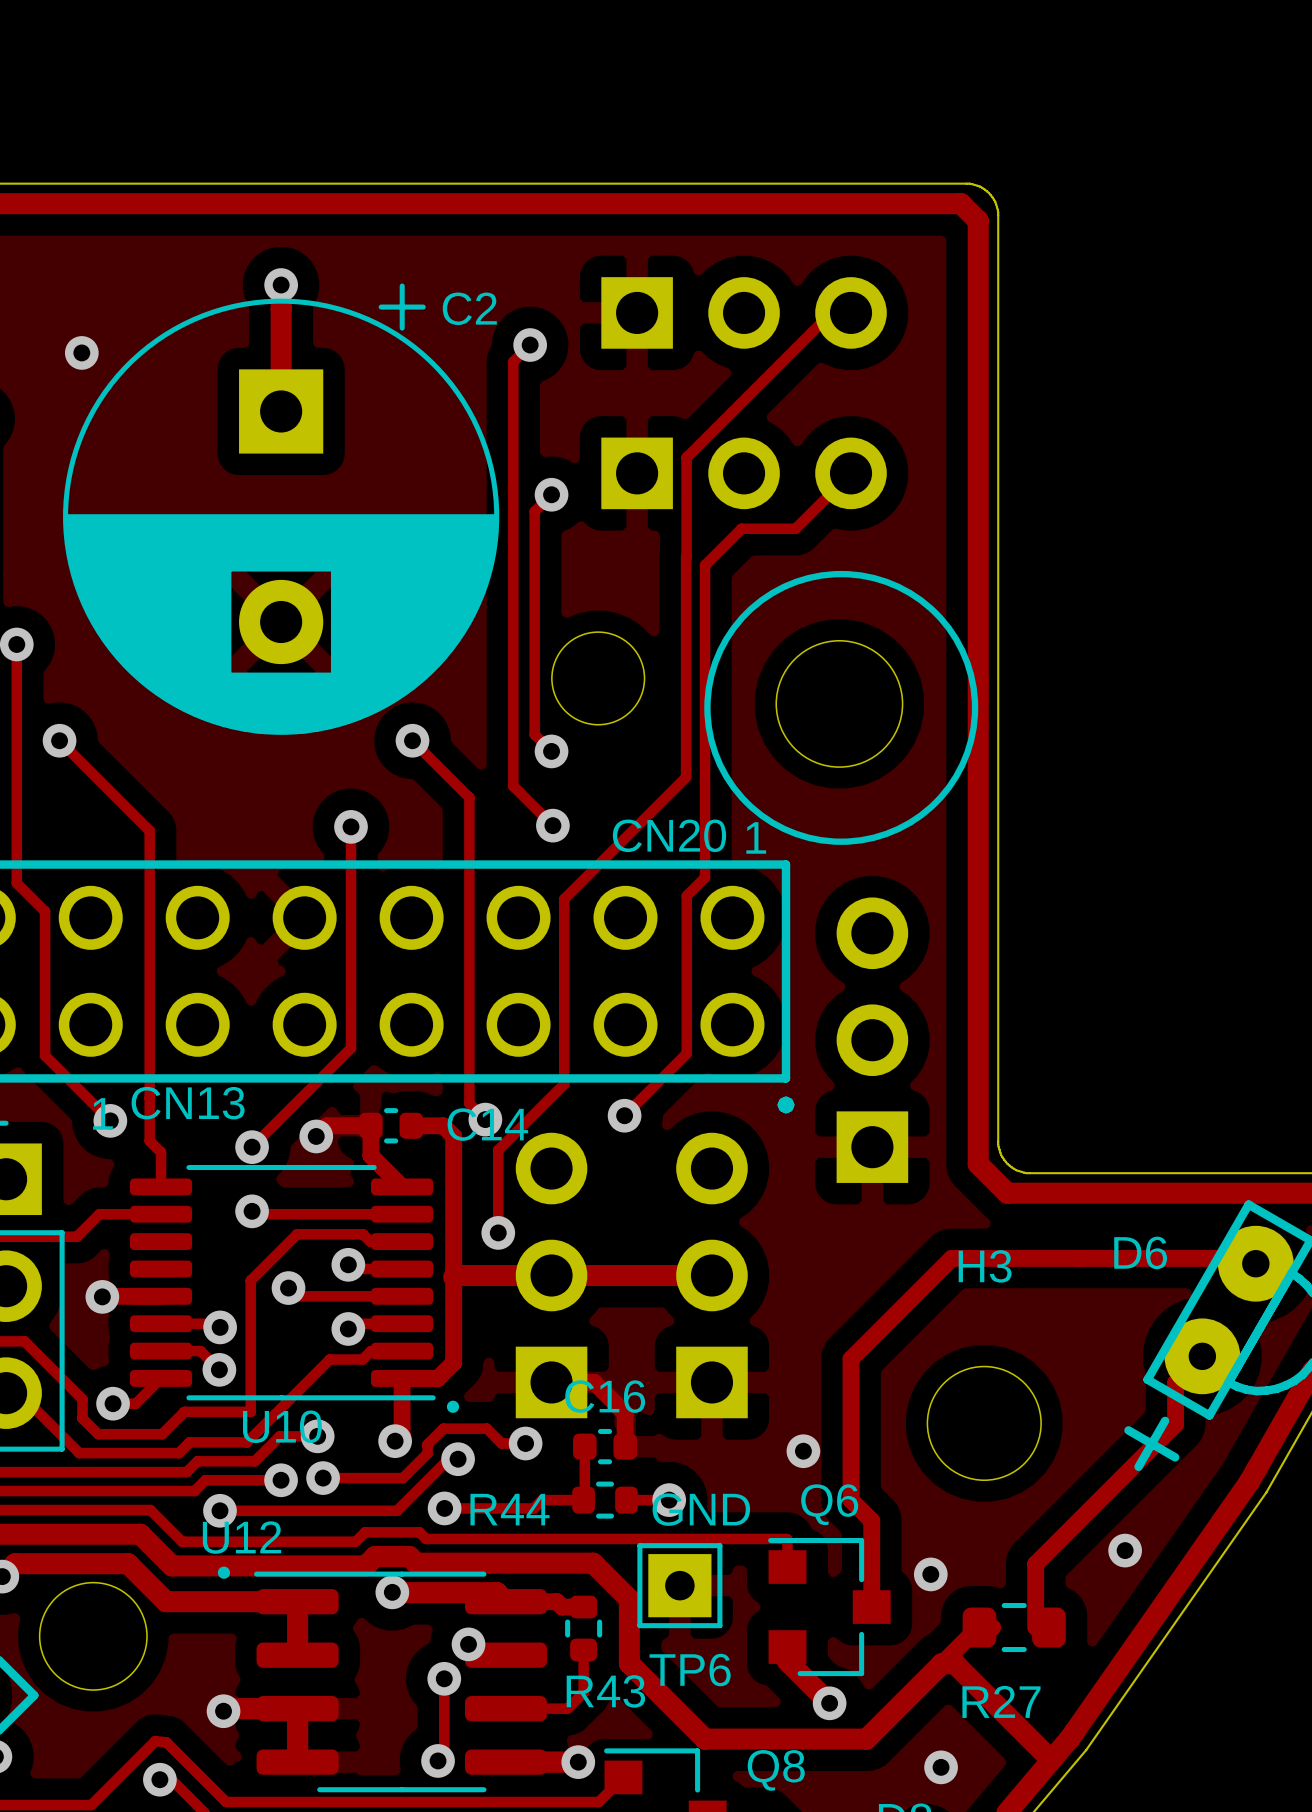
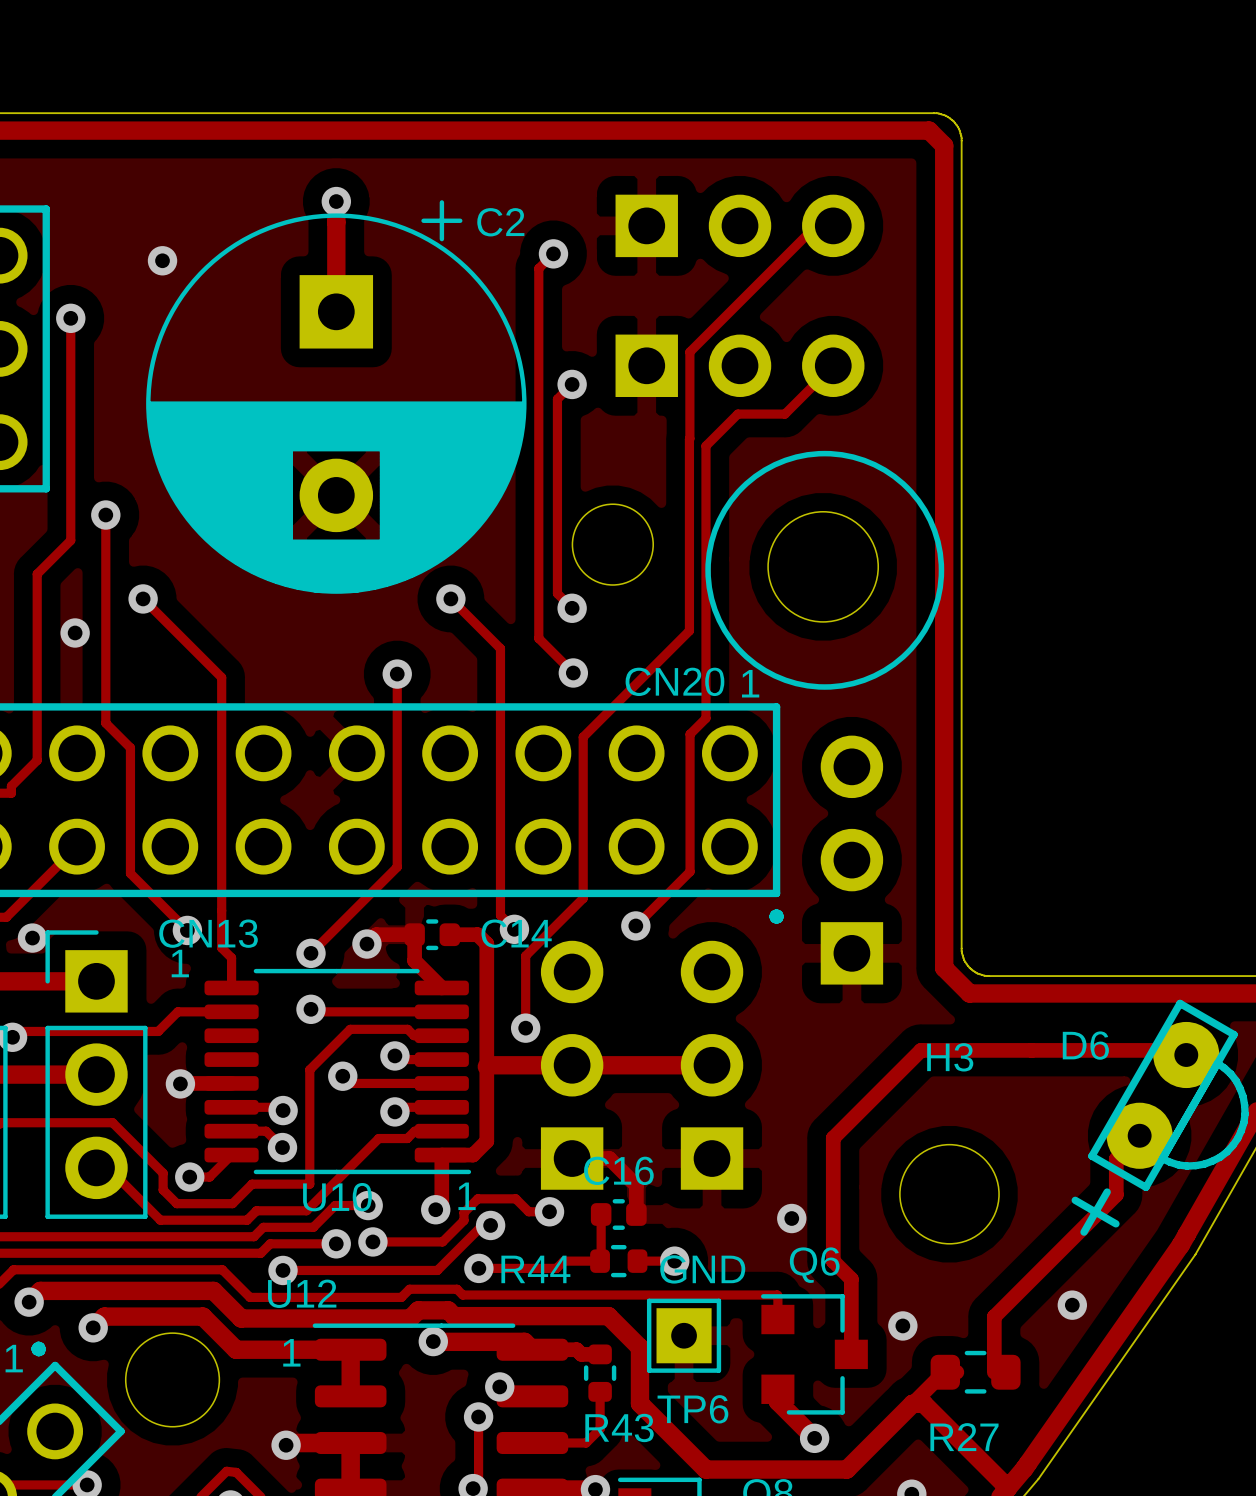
CN13 name position: CN13 (188, 1103) -> CN13 (208, 933)
text position: 1 (102, 1113) -> 1 (180, 963)
drawing: [446, 1400, 460, 1413] -> none
text: none -> 1 (467, 1196)
drawing: [217, 1566, 231, 1579] -> none
text: none -> 1 (291, 1352)

